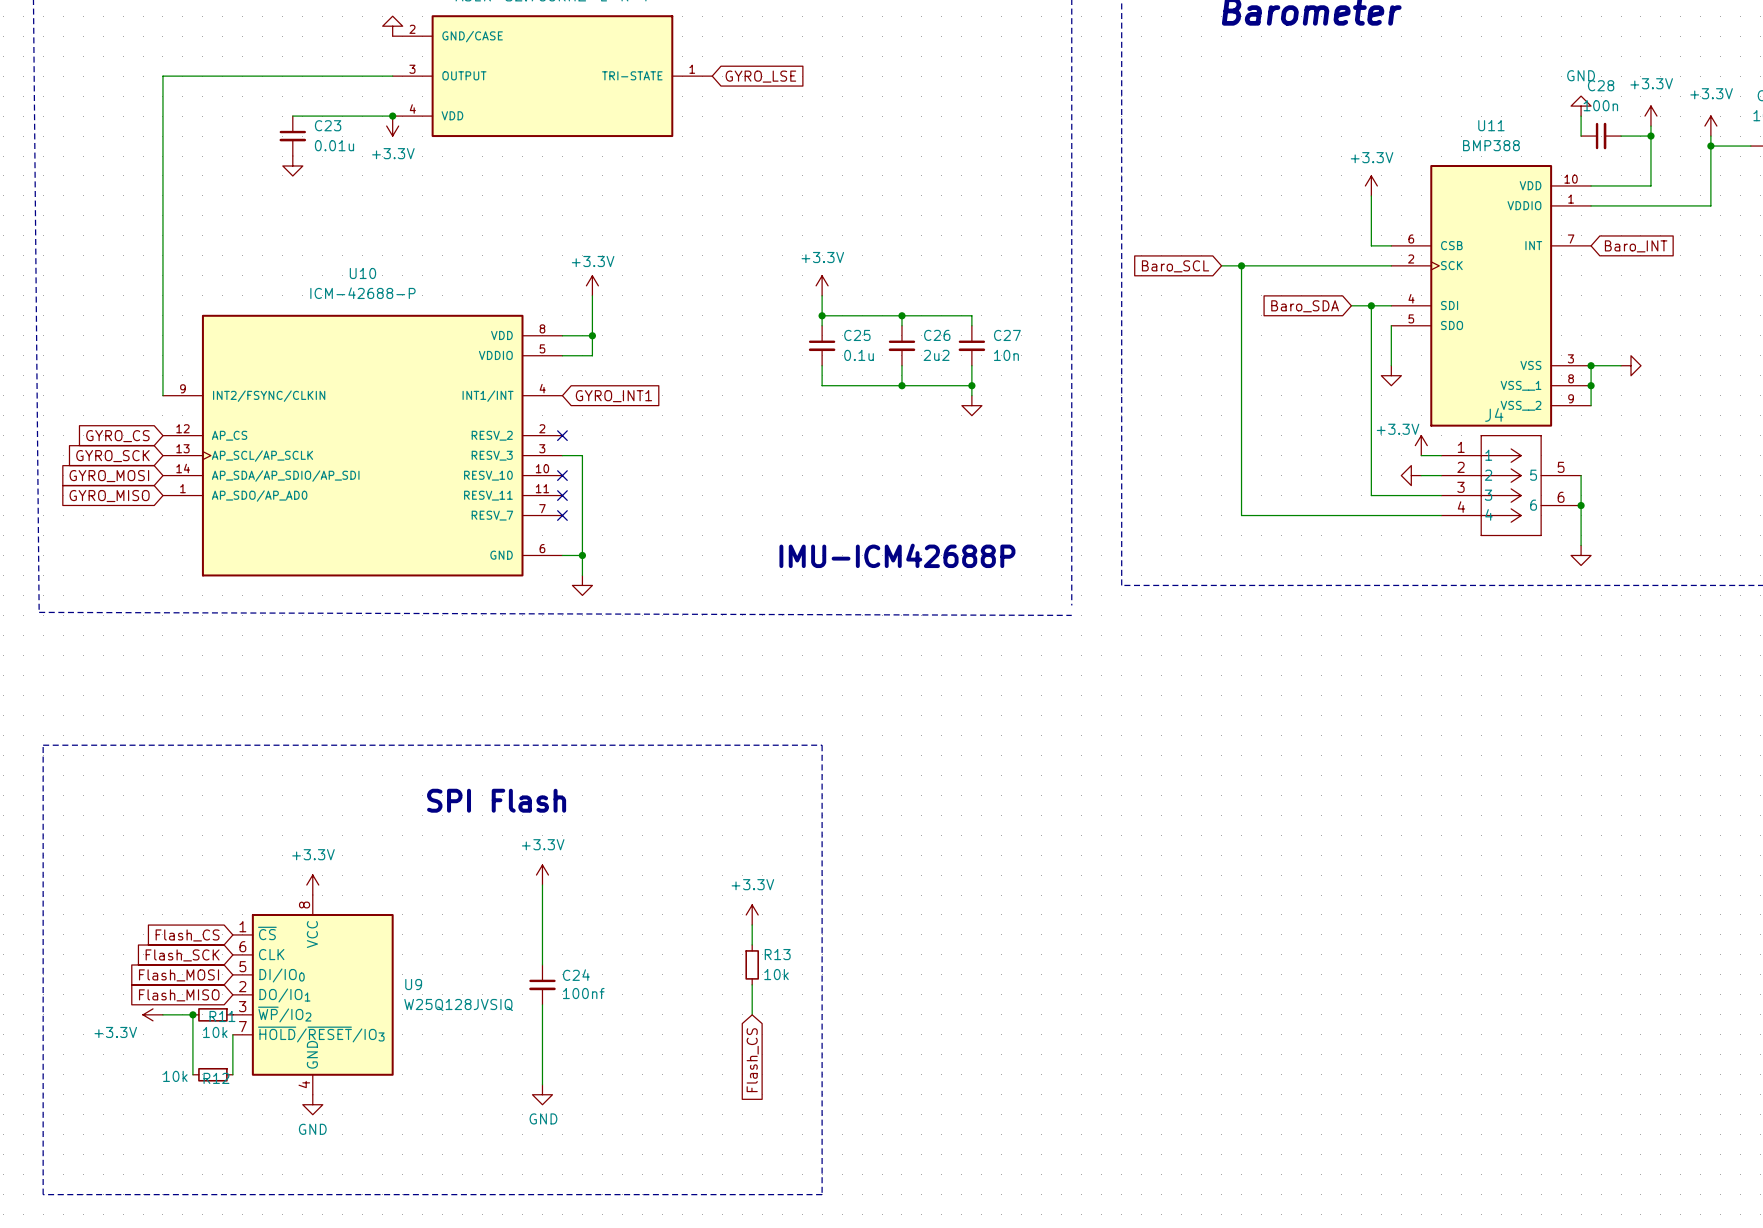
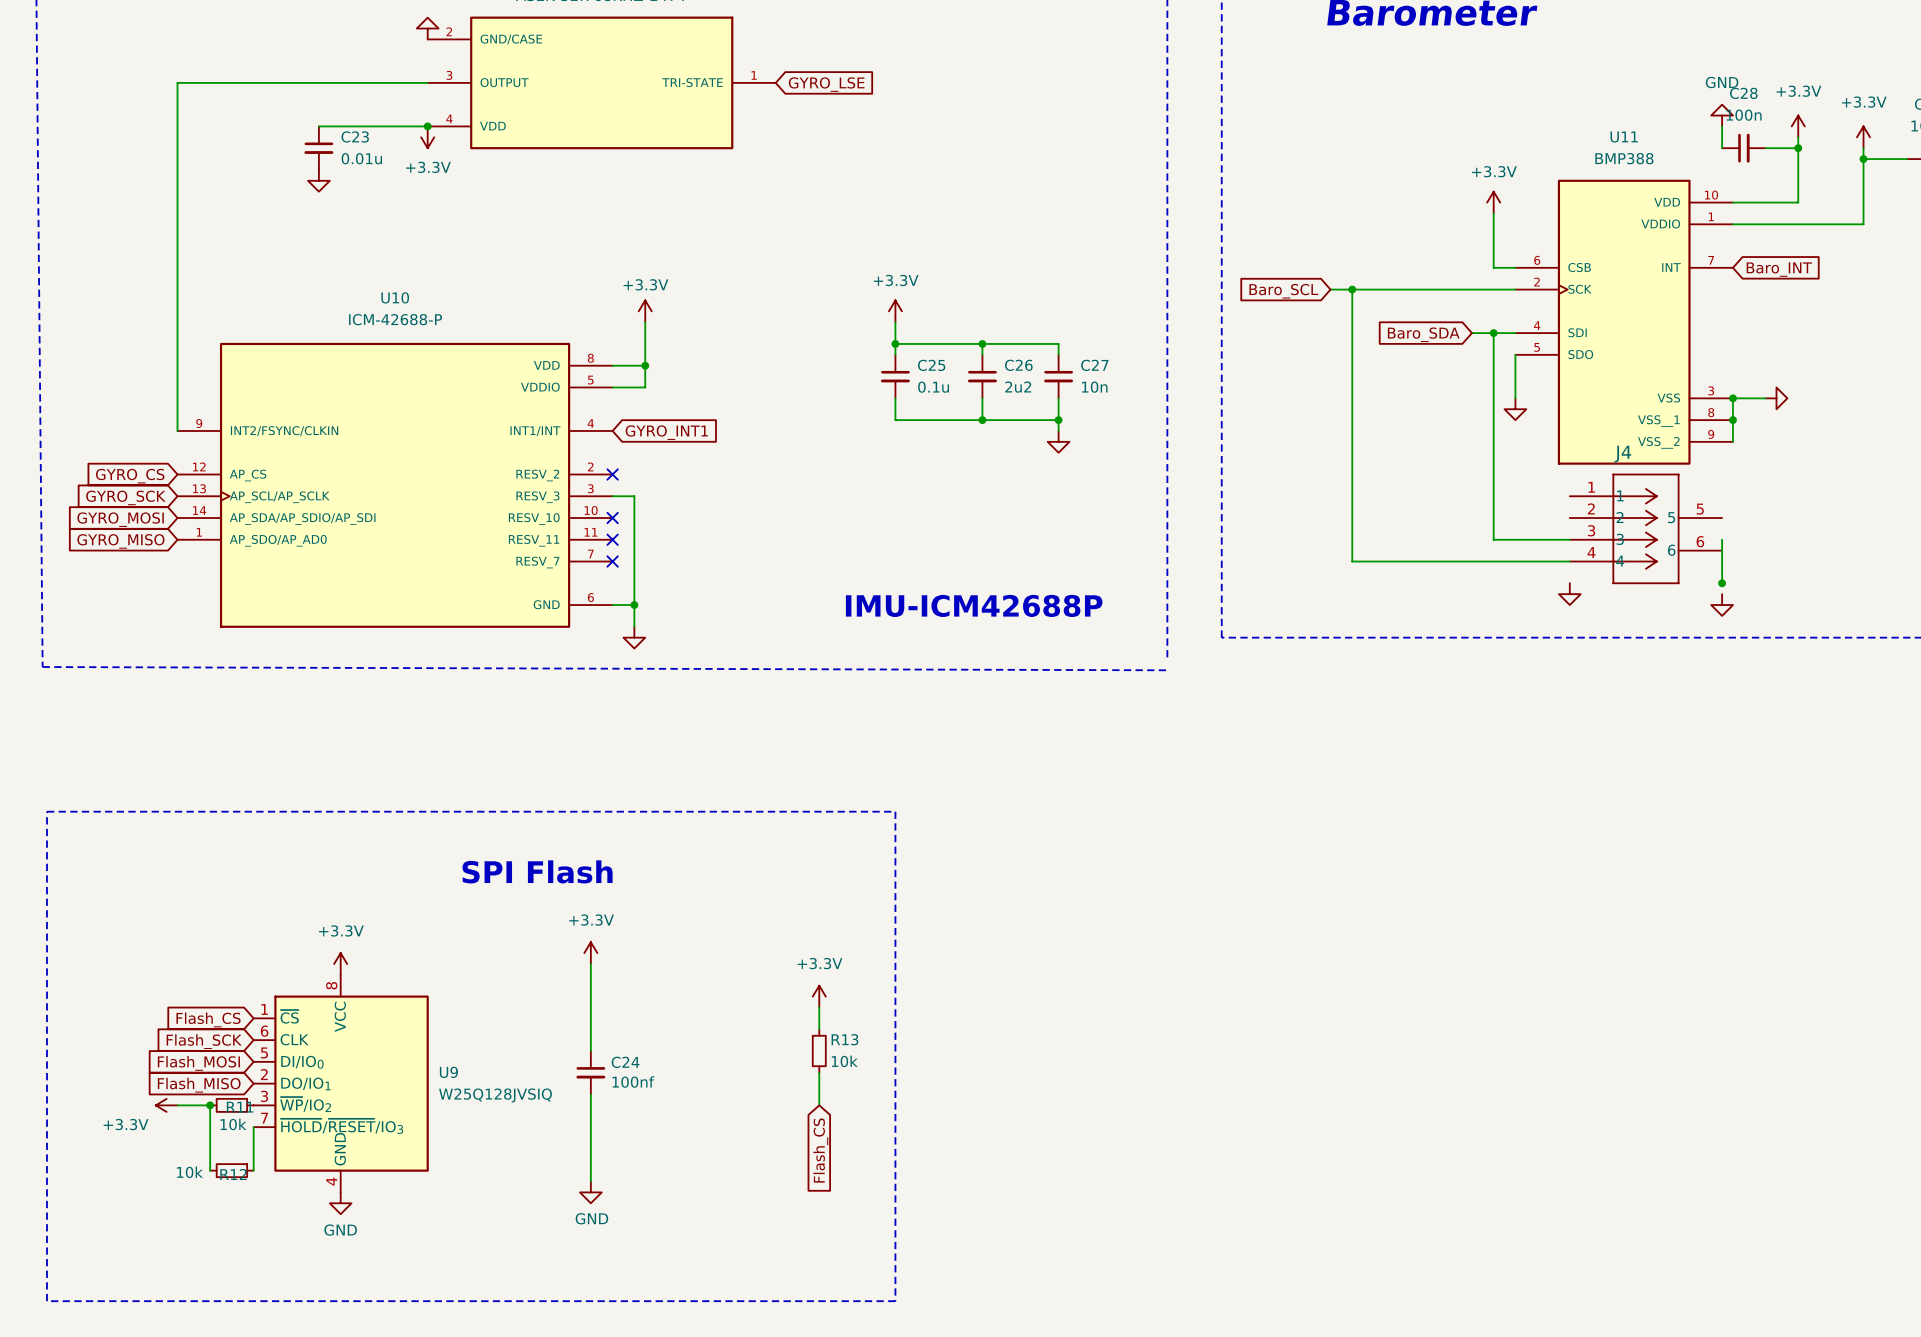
power symbol: +3.3V (1421, 445) -> none
wire: (1421, 455) (1441, 455) -> none
power symbol rotation: 0° (1411, 475) -> 90° counterclockwise (1569, 594)
power symbol position: (1411, 475) -> (1569, 594)
wire: (1421, 475) (1441, 475) -> none
wire: (1581, 475) (1581, 495) -> none
junction position: (1581, 505) -> (1722, 583)
wire: (1581, 535) (1581, 545) -> none

